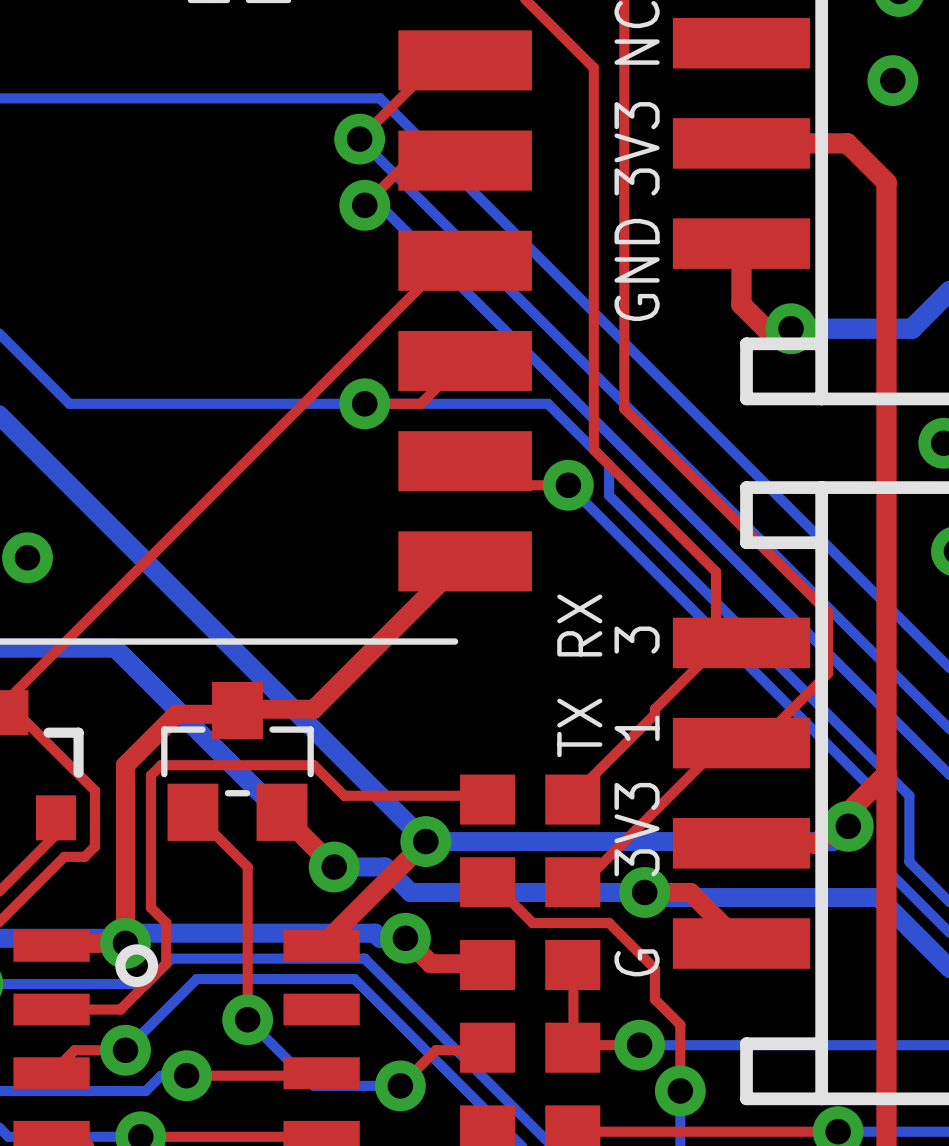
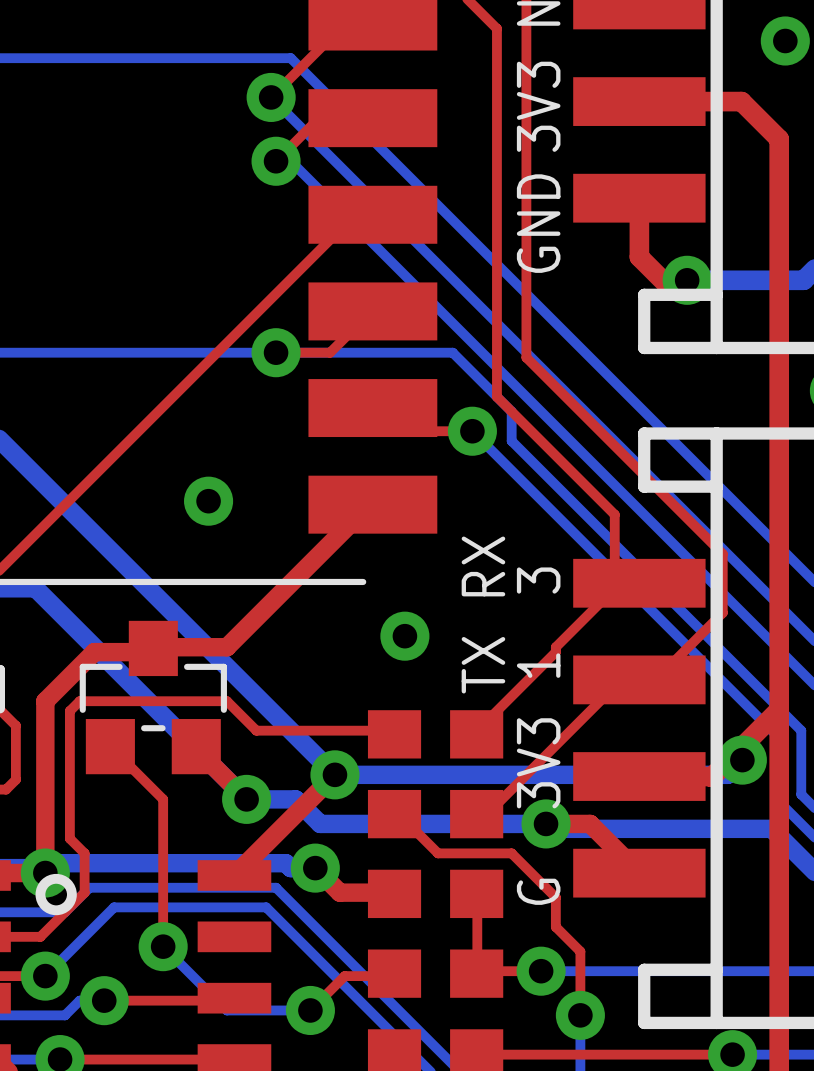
via: none -> (208, 501)
via: none -> (404, 636)

